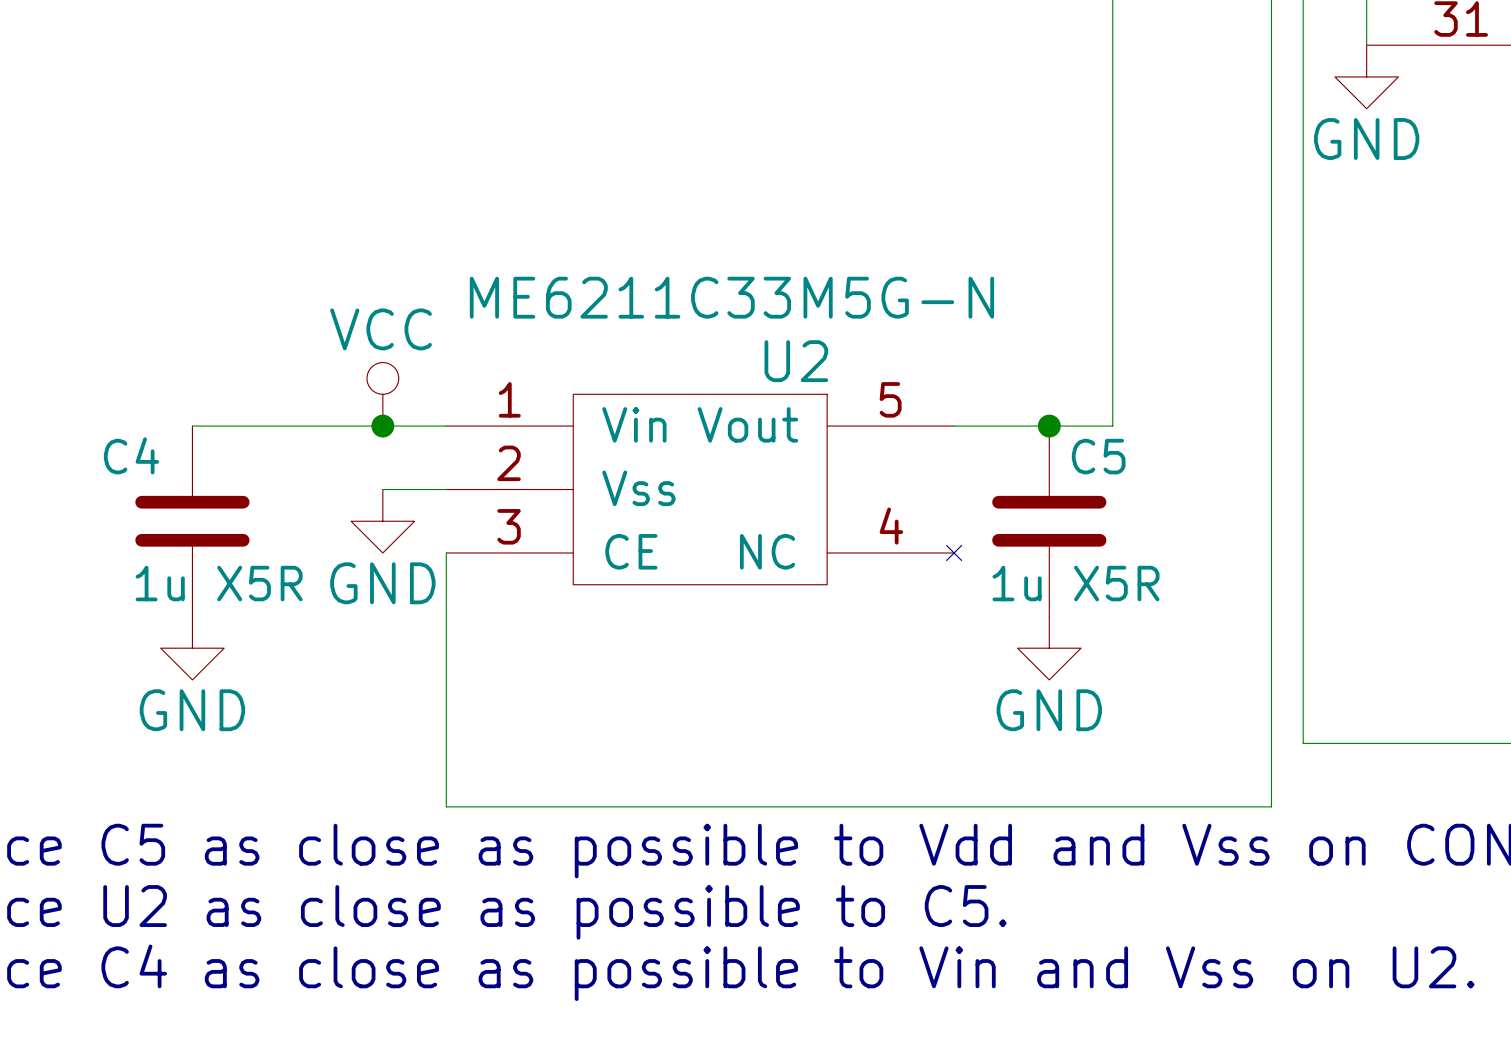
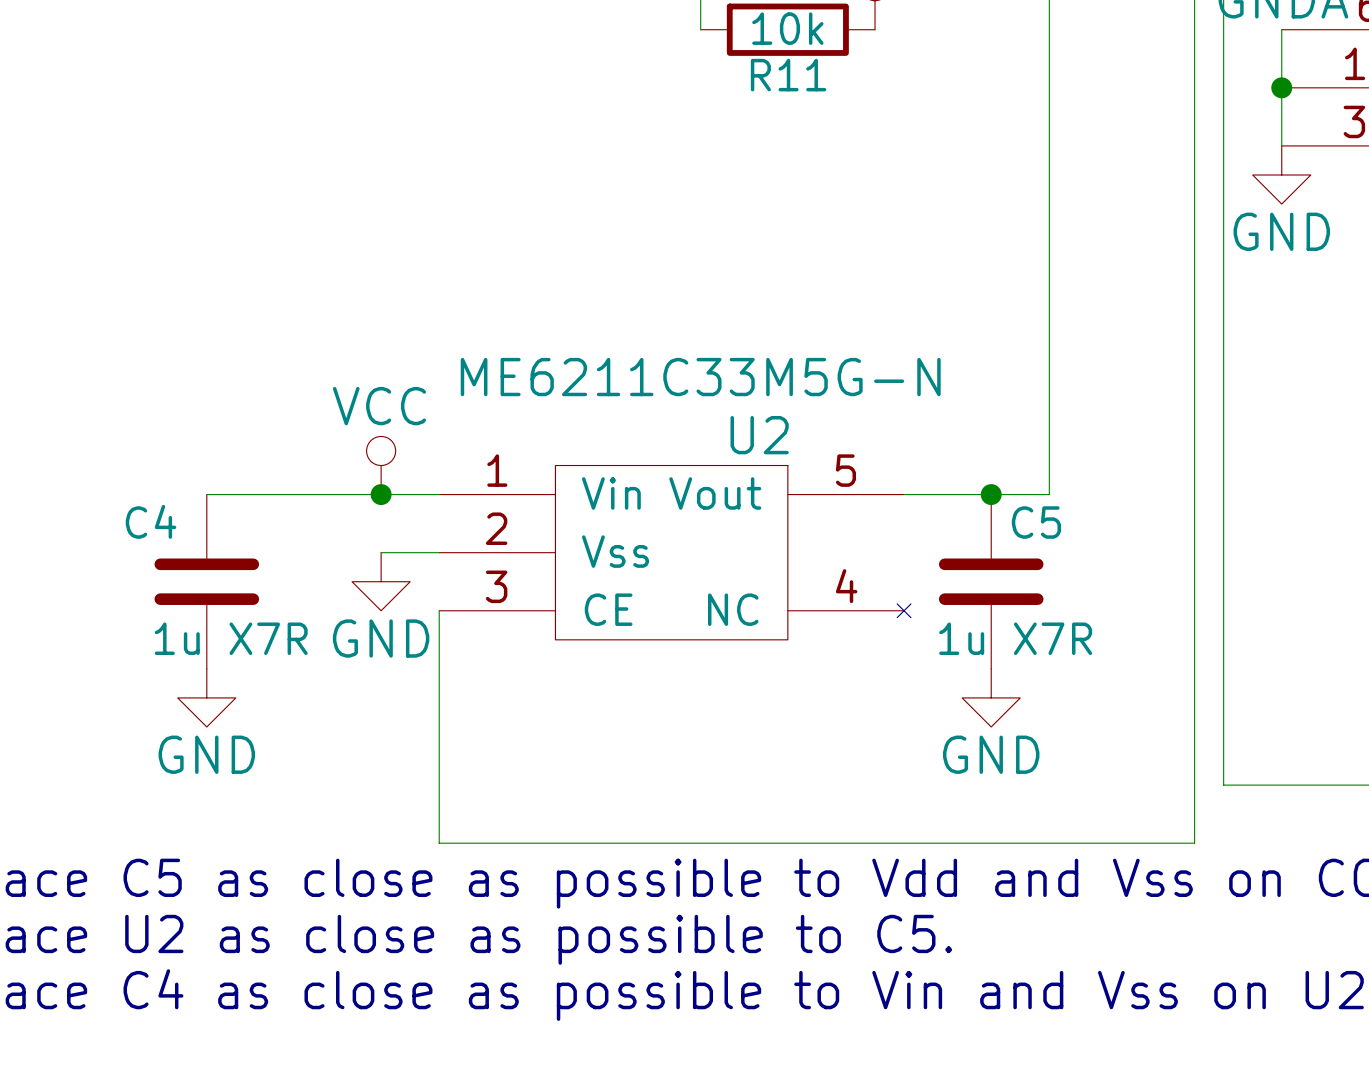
C4 value: 1u X5R (219, 583) -> 1u X7R (231, 638)
C5 value: 1u X5R (1075, 583) -> 1u X7R (1015, 638)

